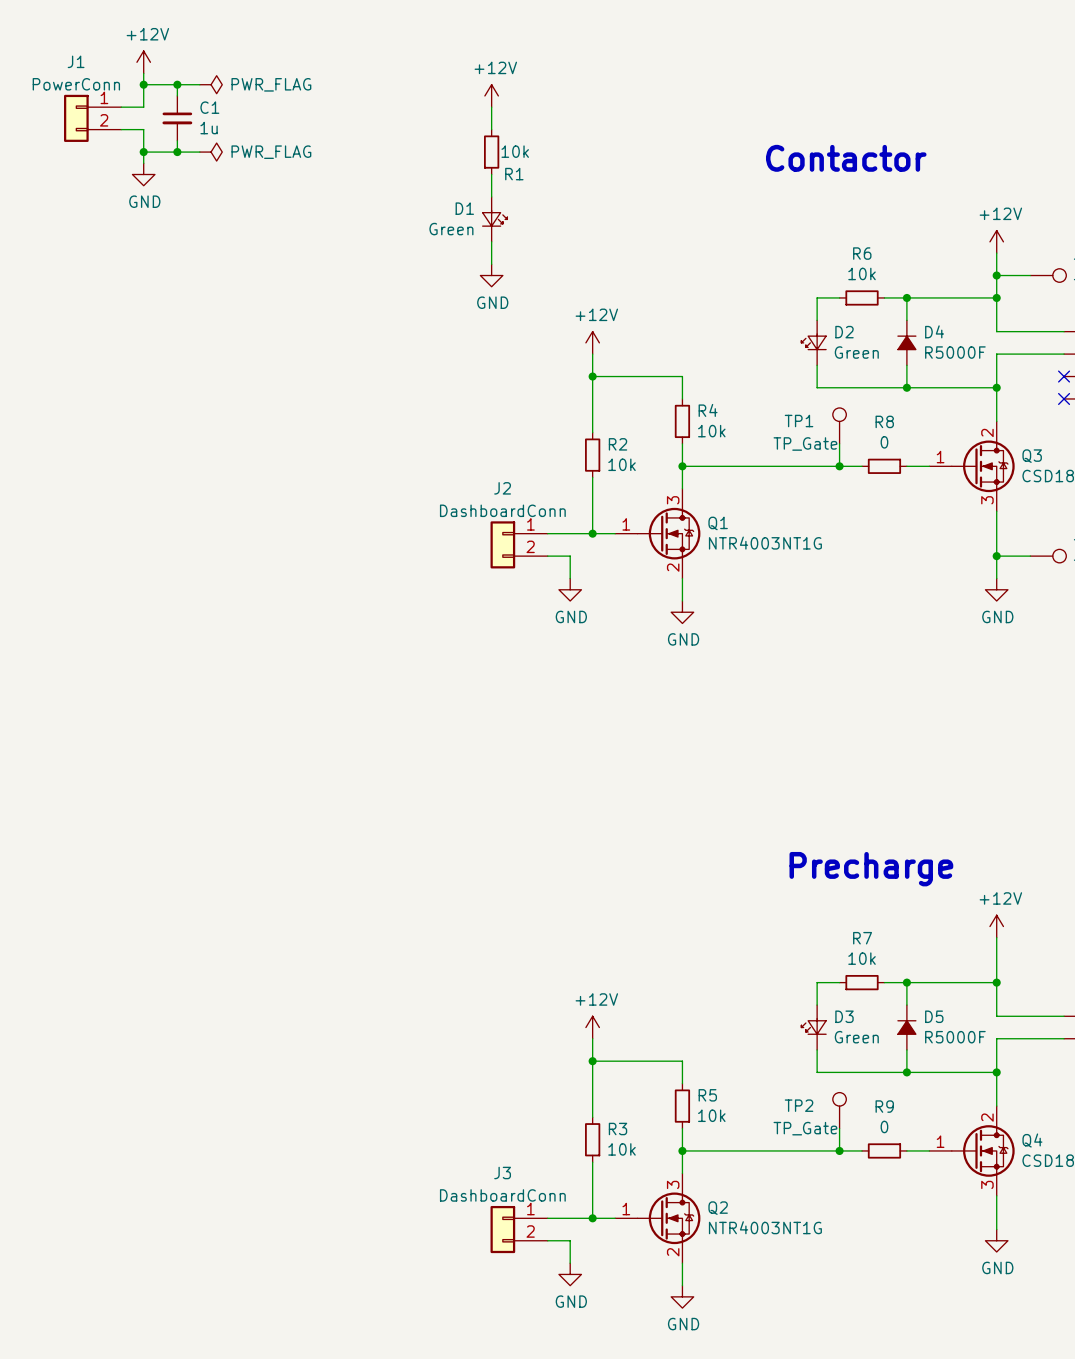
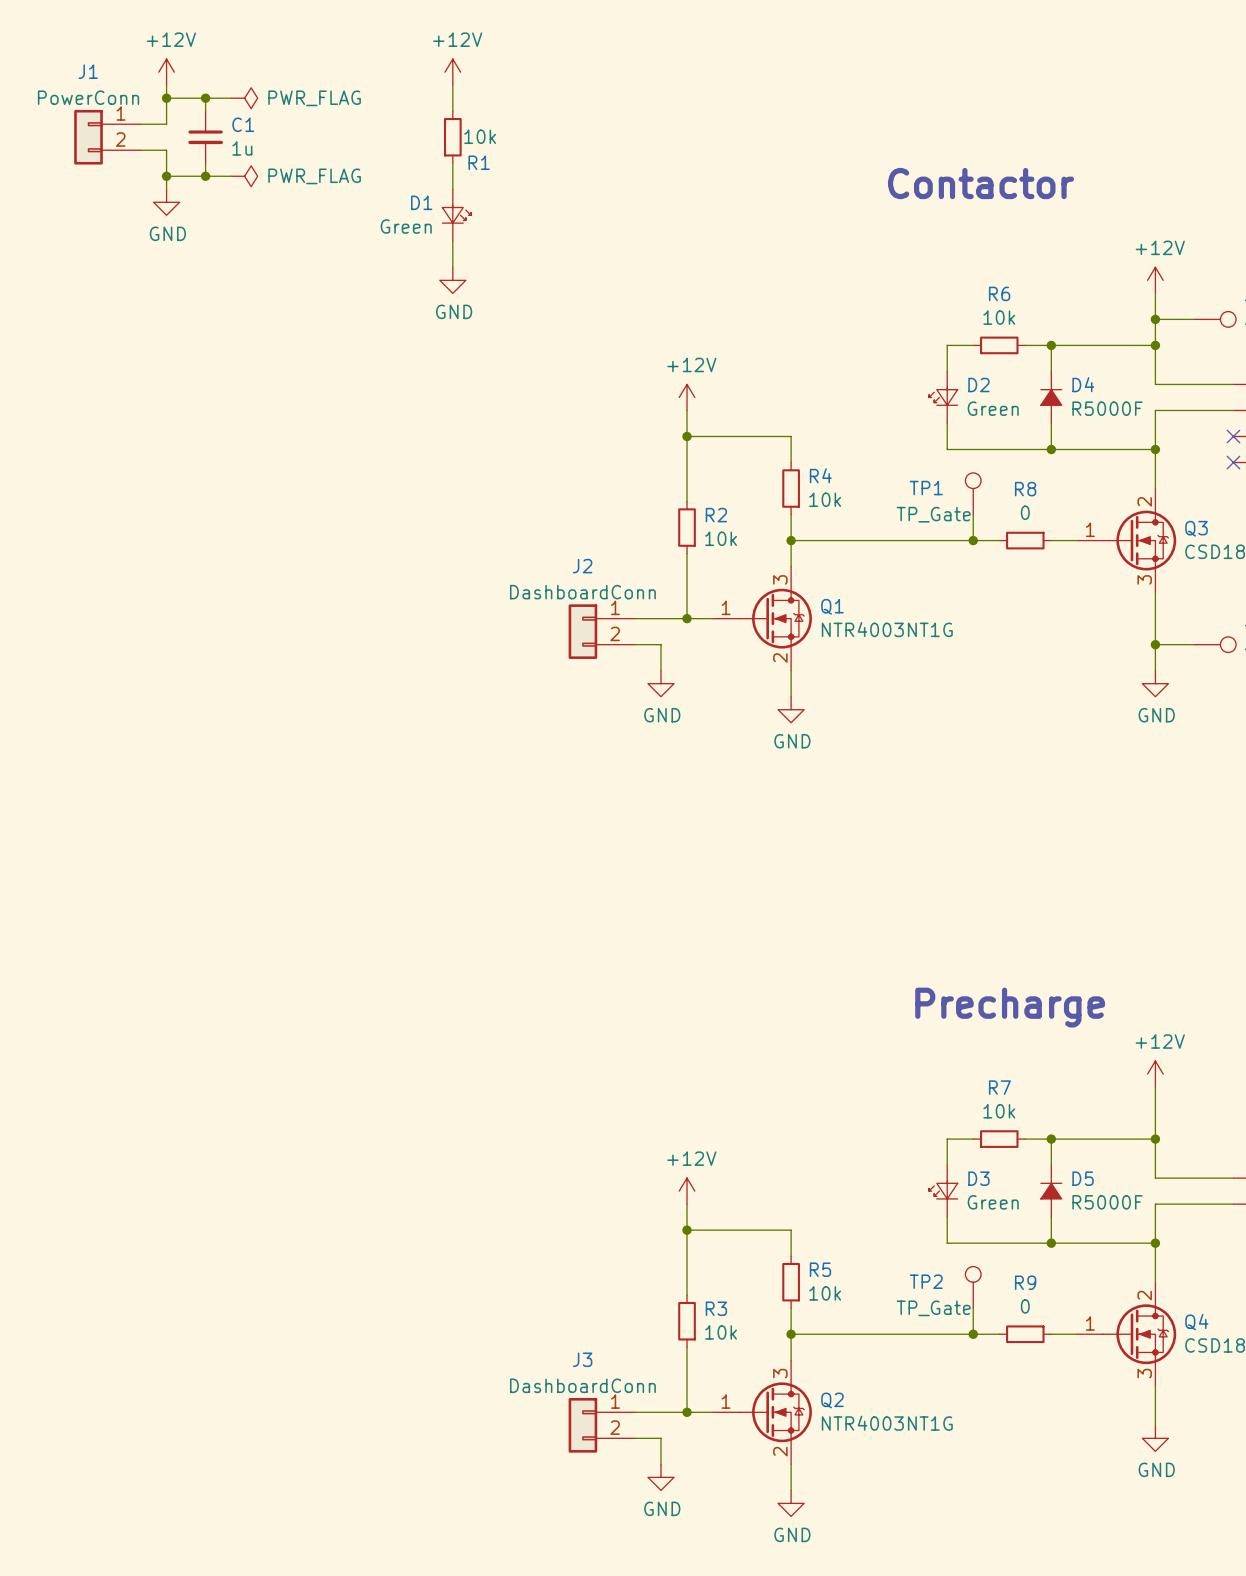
power symbol position: +12V (491, 95) -> +12V (452, 72)
wire: (491, 107) (491, 129) -> (452, 163) (452, 189)
R1 position: (491, 152) -> (452, 137)
wire: (491, 174) (491, 196) -> (452, 85) (452, 111)
D1 position: (495, 219) -> (456, 215)
wire: (491, 241) (491, 264) -> (452, 241) (452, 267)
power symbol position: GND (491, 275) -> GND (452, 280)

